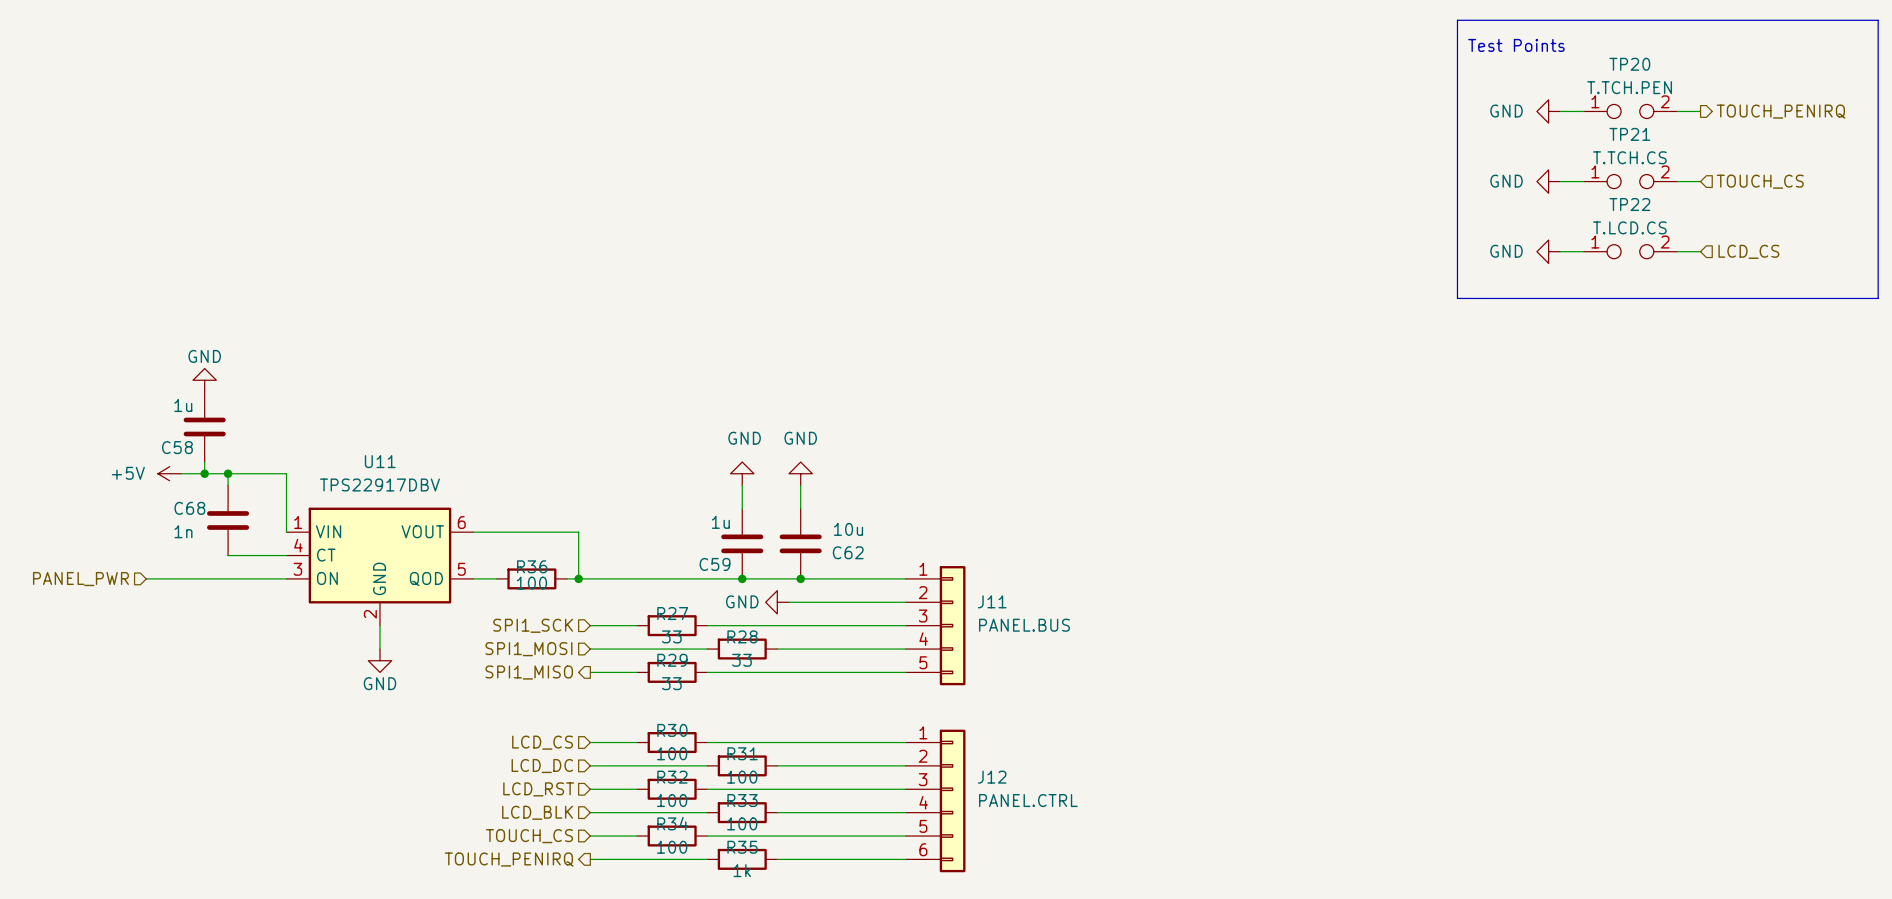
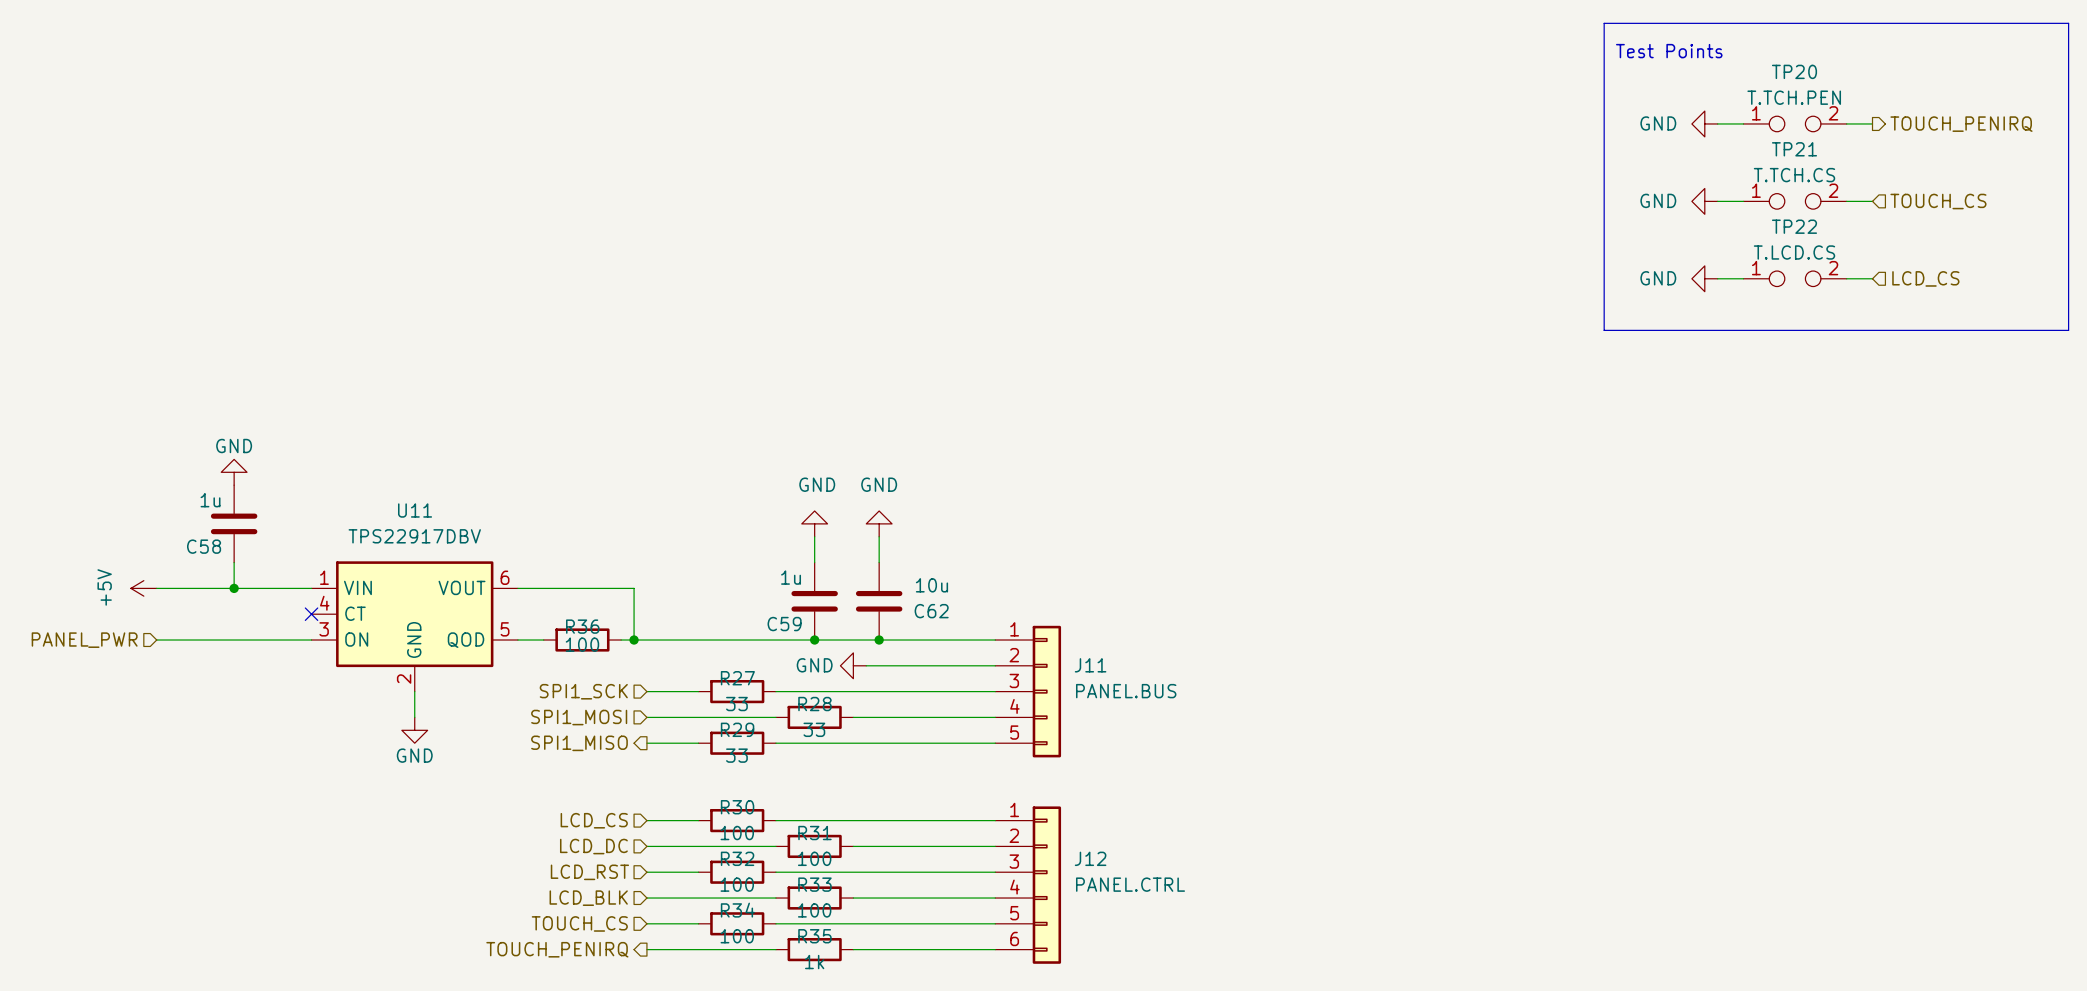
power symbol position: GND (204, 380) -> GND (234, 472)
C58 position: (204, 426) -> (234, 523)
wire: (204, 462) (204, 473) -> none
power symbol text rotation: 0° (128, 473) -> 90° counterclockwise (104, 587)
power symbol position: +5V (169, 473) -> +5V (143, 588)
wire: (181, 473) (286, 473) (286, 532) -> (156, 588) (311, 588)
junction: (204, 473) -> none
wire: (228, 473) (228, 485) -> none
junction: (228, 473) -> none
wire: none -> (234, 562) (234, 588)
C68: 1n (228, 520) -> none
junction: none -> (234, 588)
wire: (228, 555) (286, 555) -> none
no-connect mark: none -> (311, 614)

